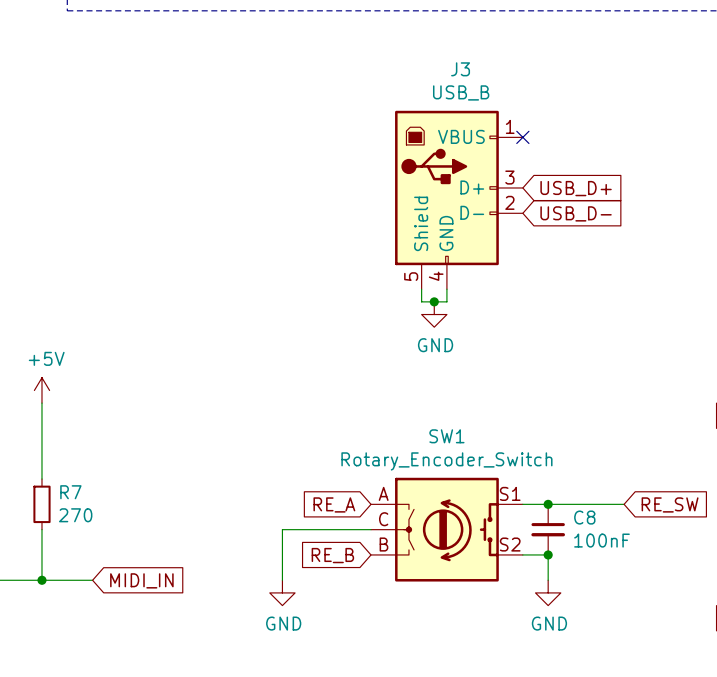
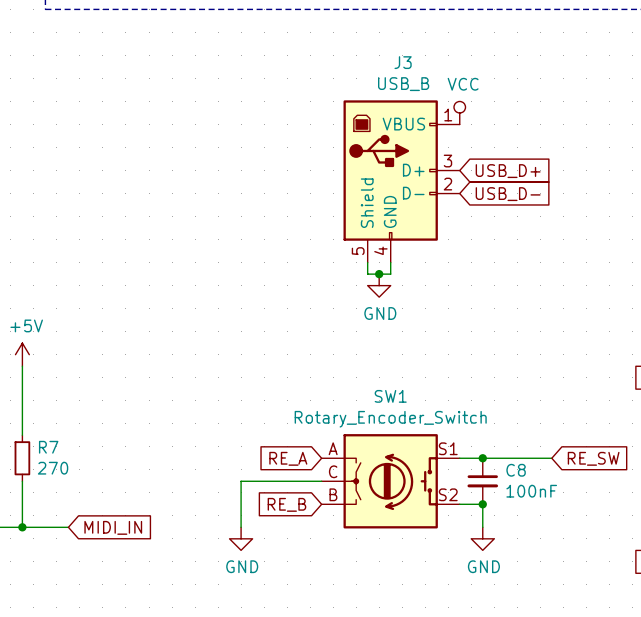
power symbol: none -> VCC (459, 112)
no-connect mark: (522, 137) -> none

